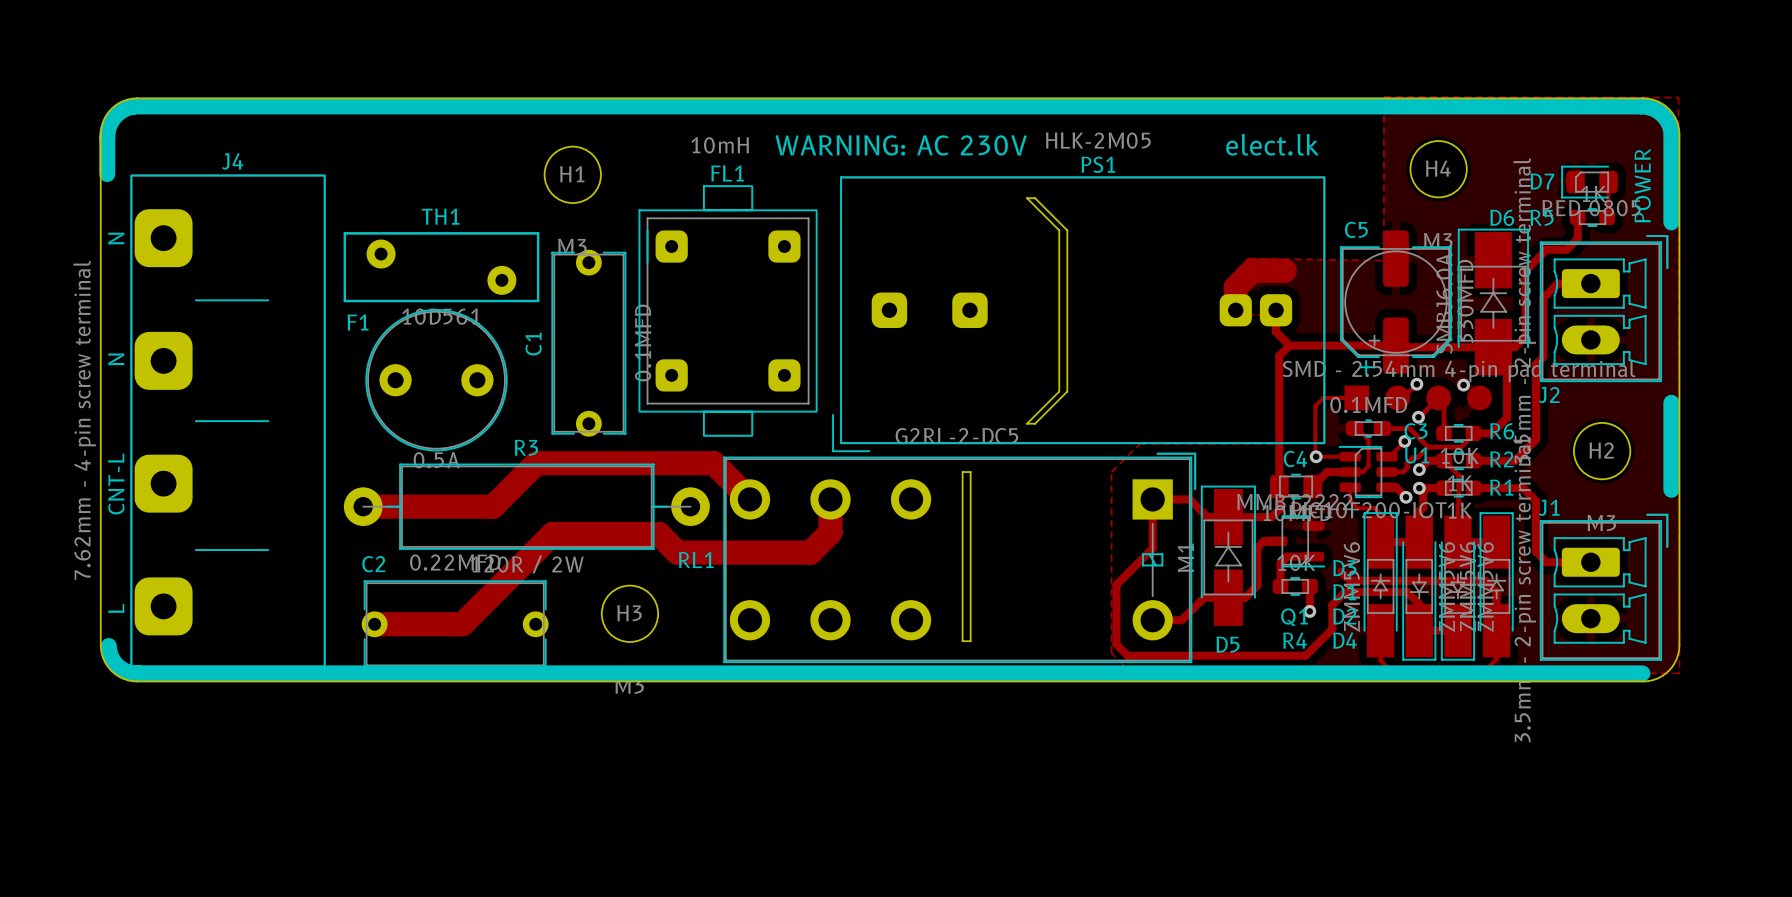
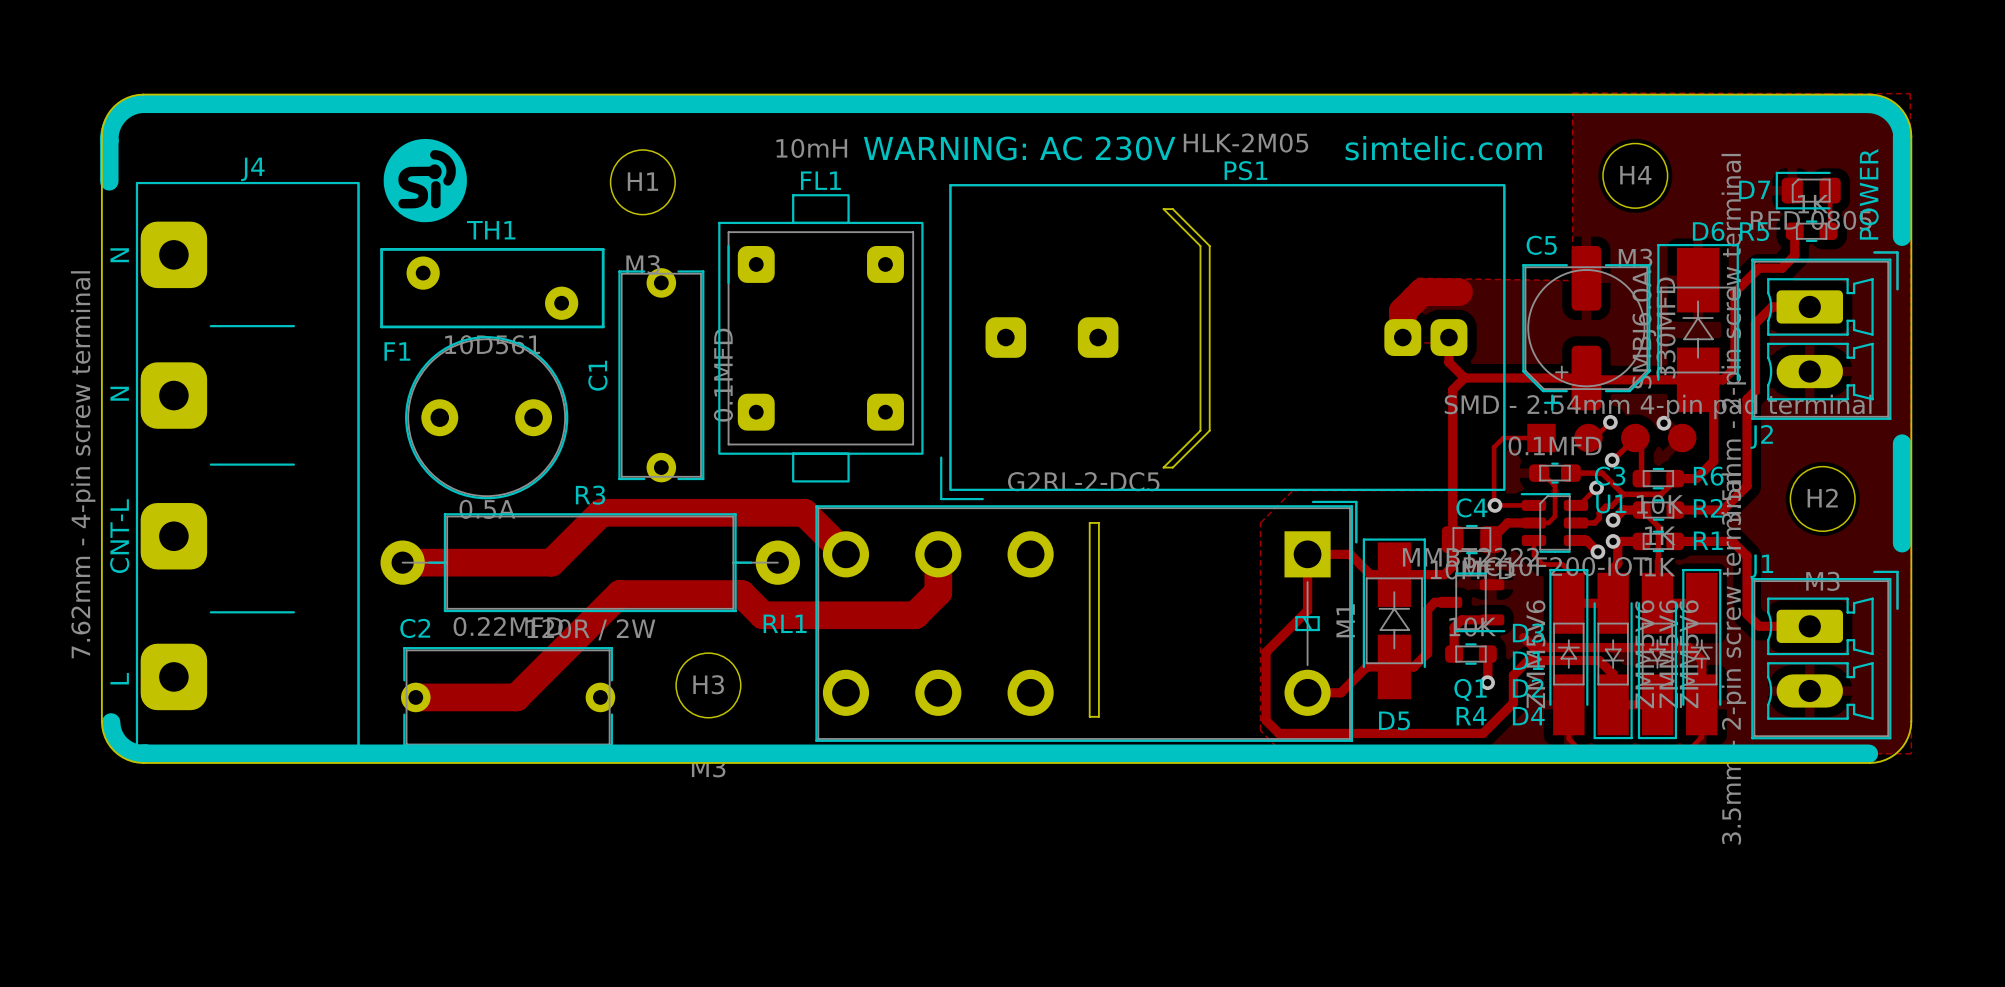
drawing: none -> [383, 138, 467, 223]
text: elect.lk (1272, 144) -> simtelic.com (1443, 148)

